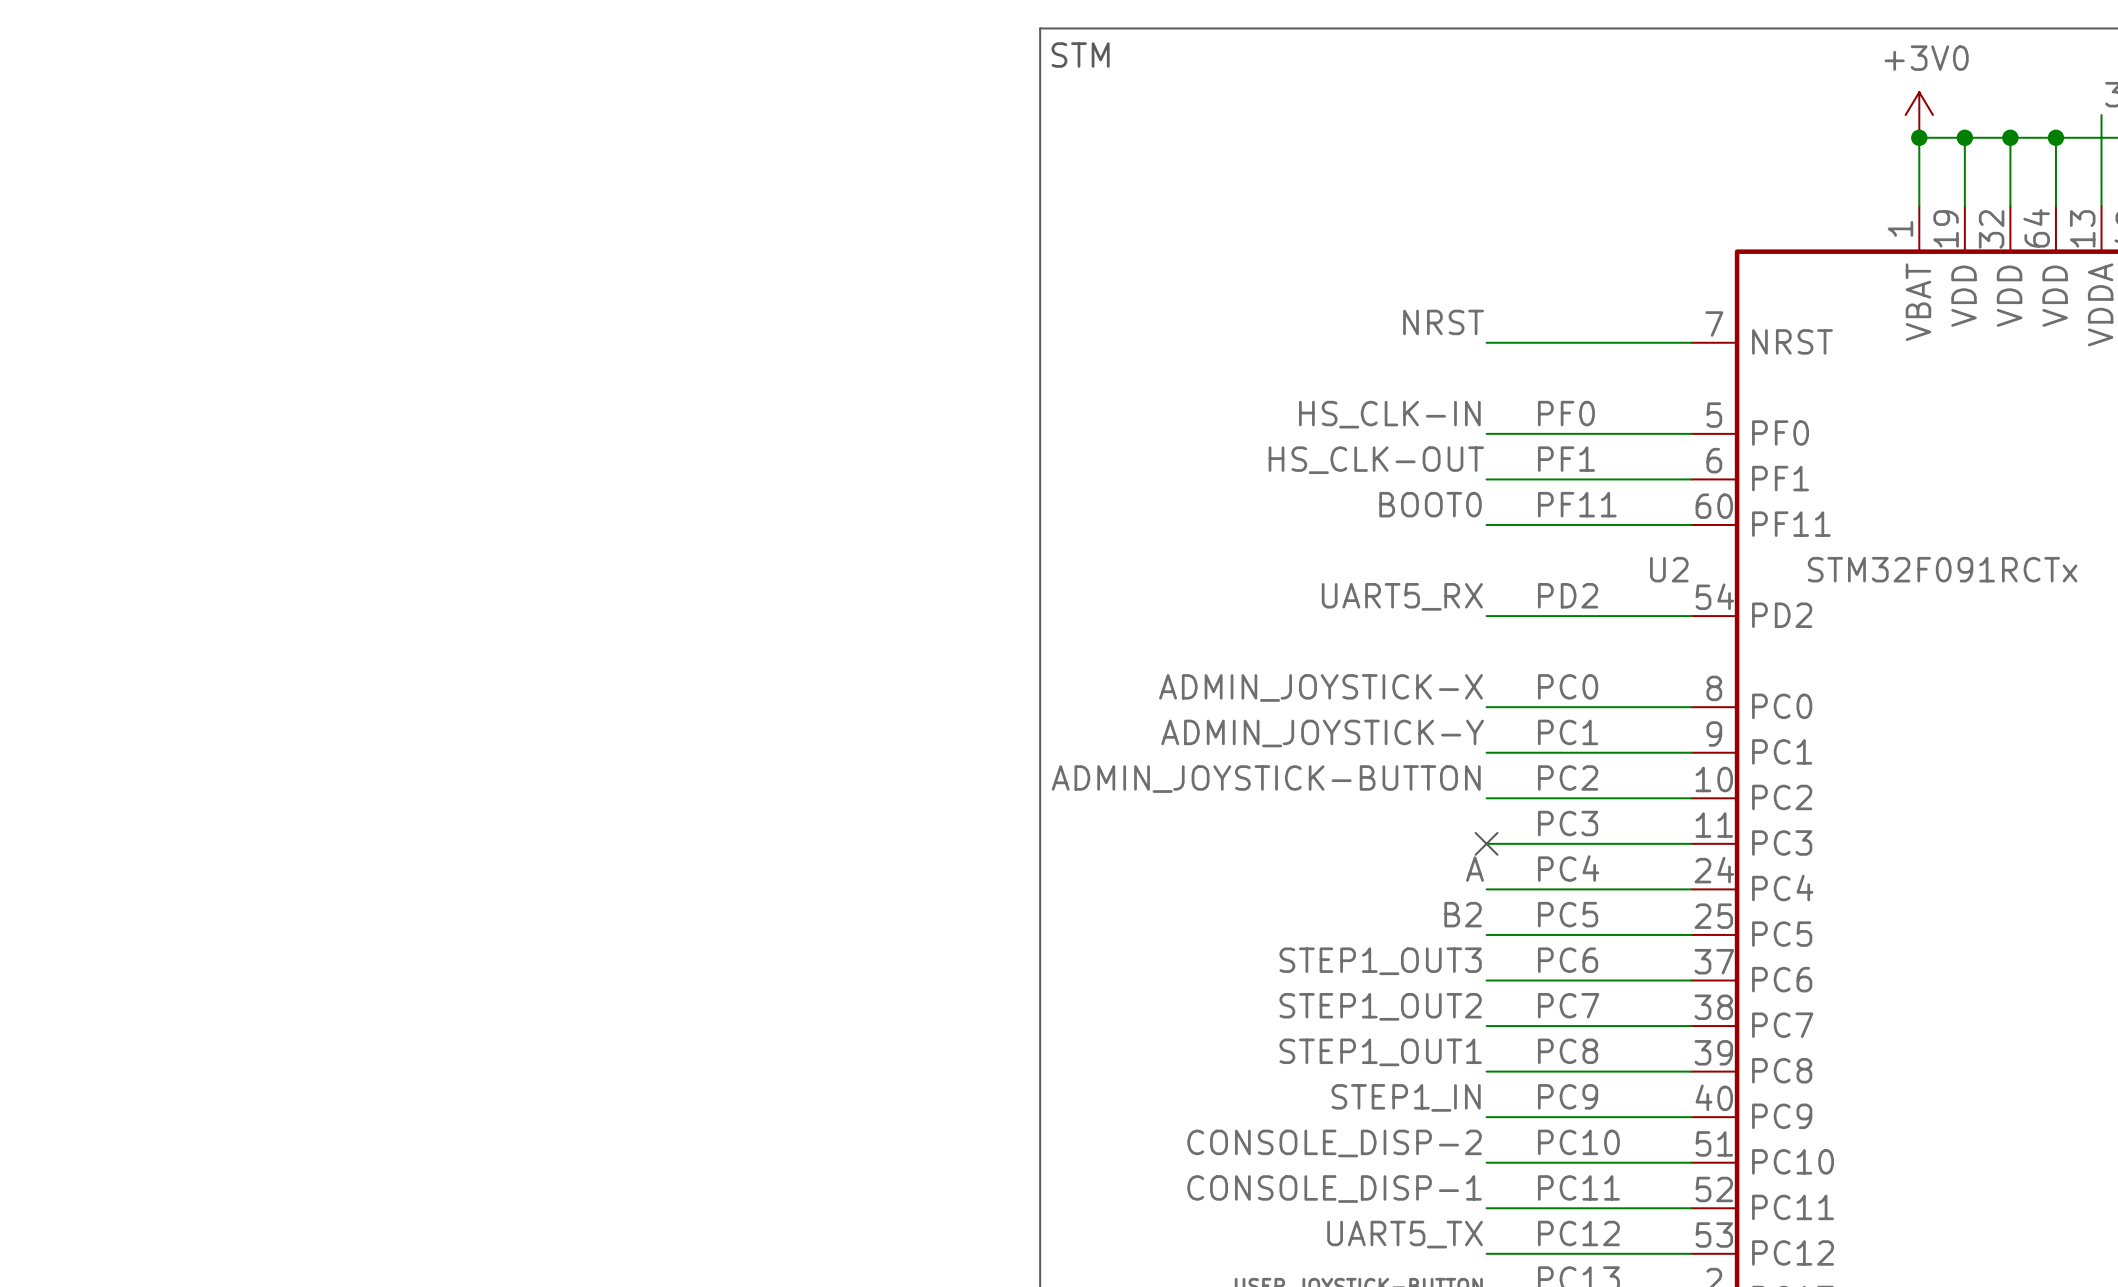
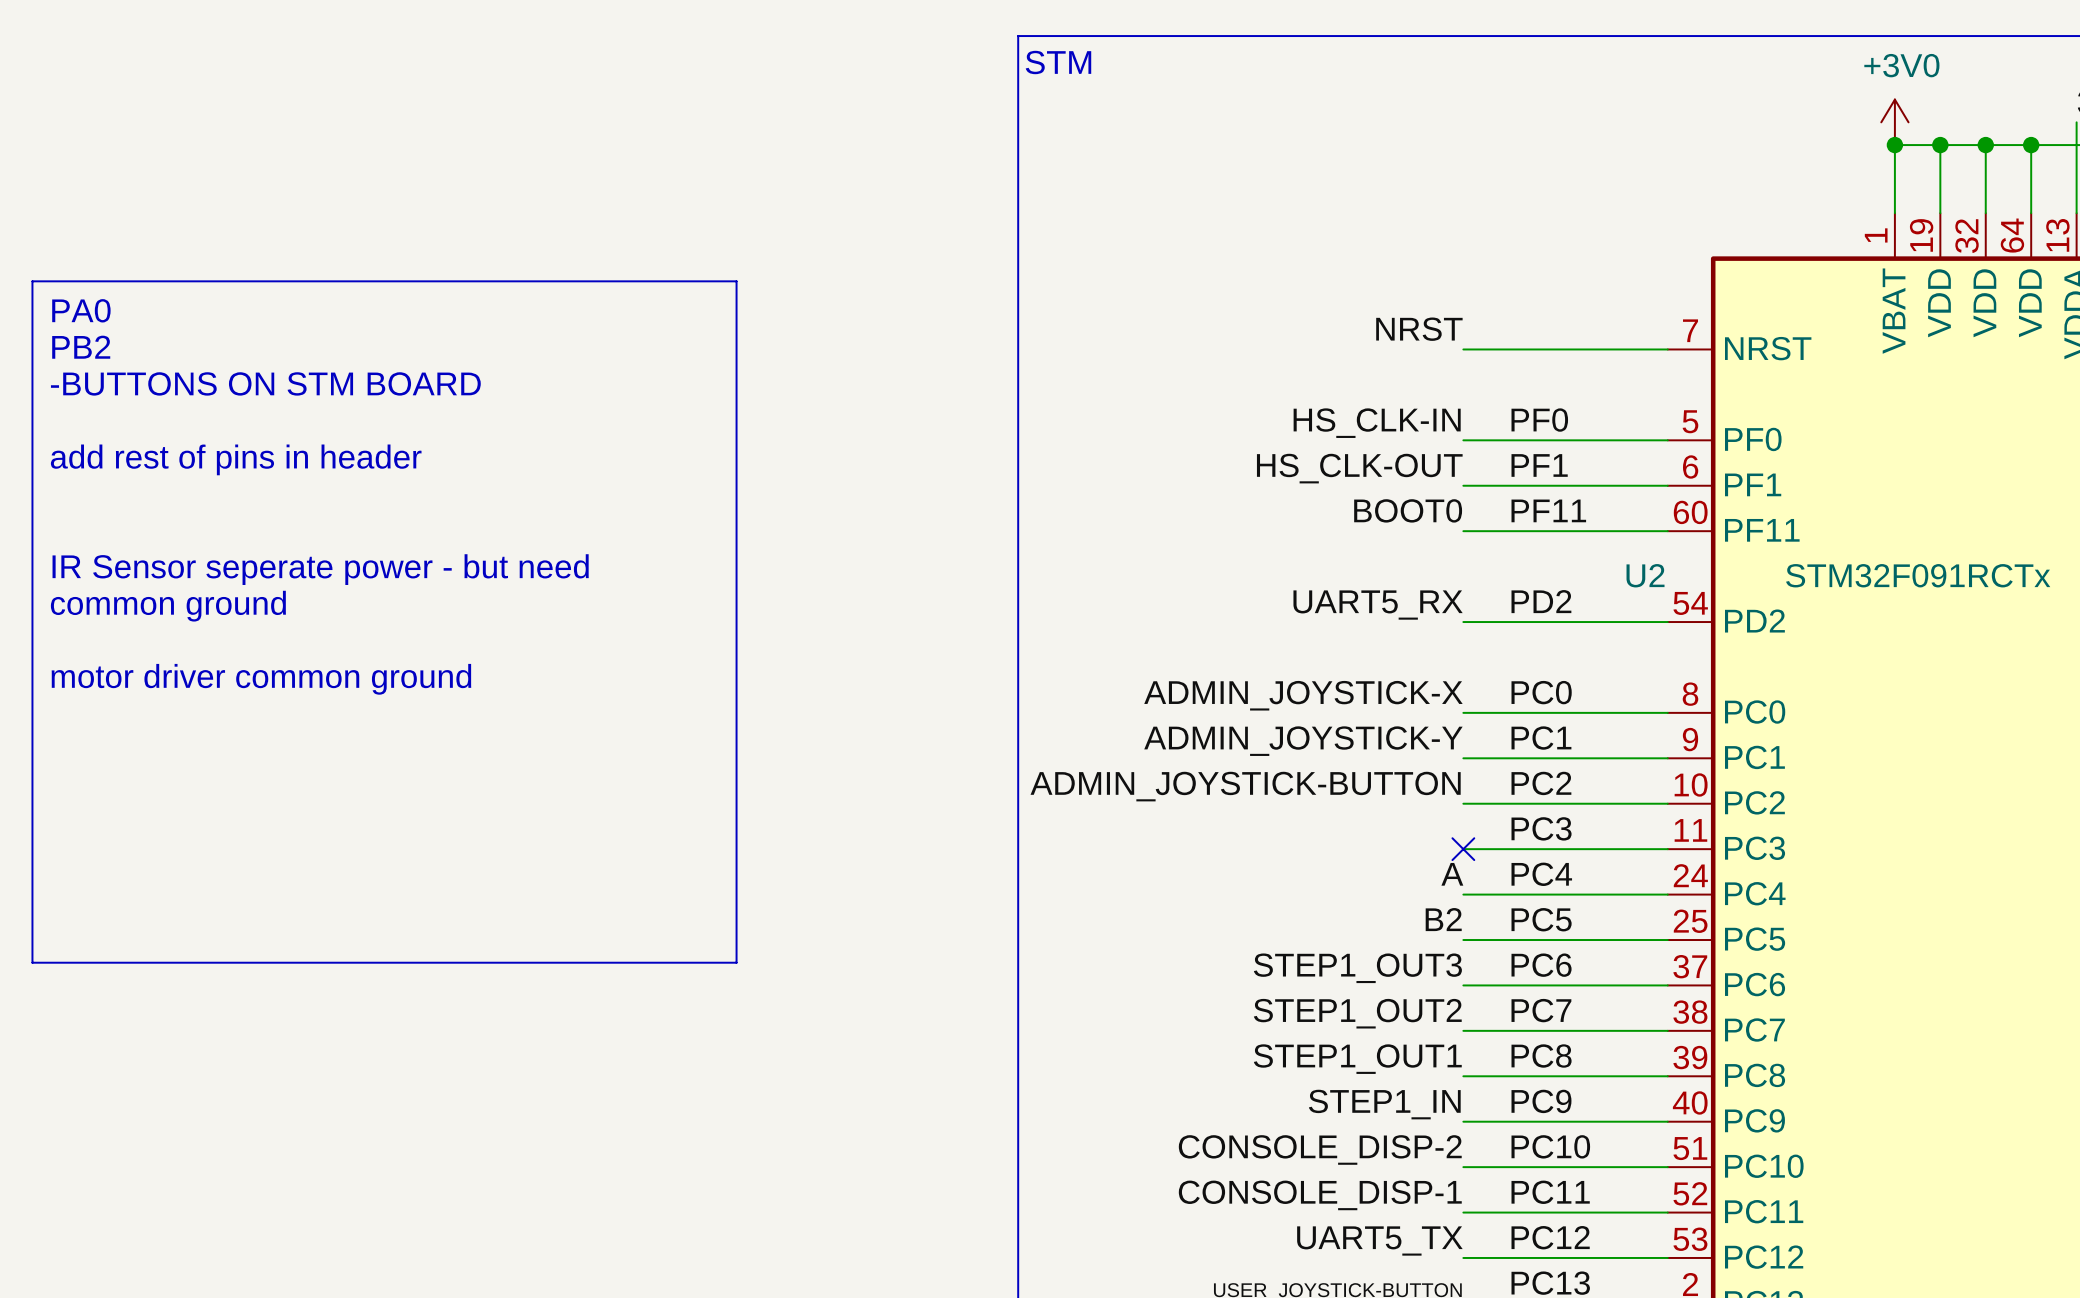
line: none -> (32, 281) (736, 281) (736, 962) (32, 962) (32, 281)
text: none -> PA0 (81, 310)
text: none -> PB2 (81, 347)
text: none -> -BUTTONS ON STM BOARD (265, 383)
text: none -> add rest of pins in header (236, 459)
text: none -> IR Sensor seperate power - but need (320, 569)
text: none -> common ground (168, 606)
text: none -> motor driver common ground (261, 679)

